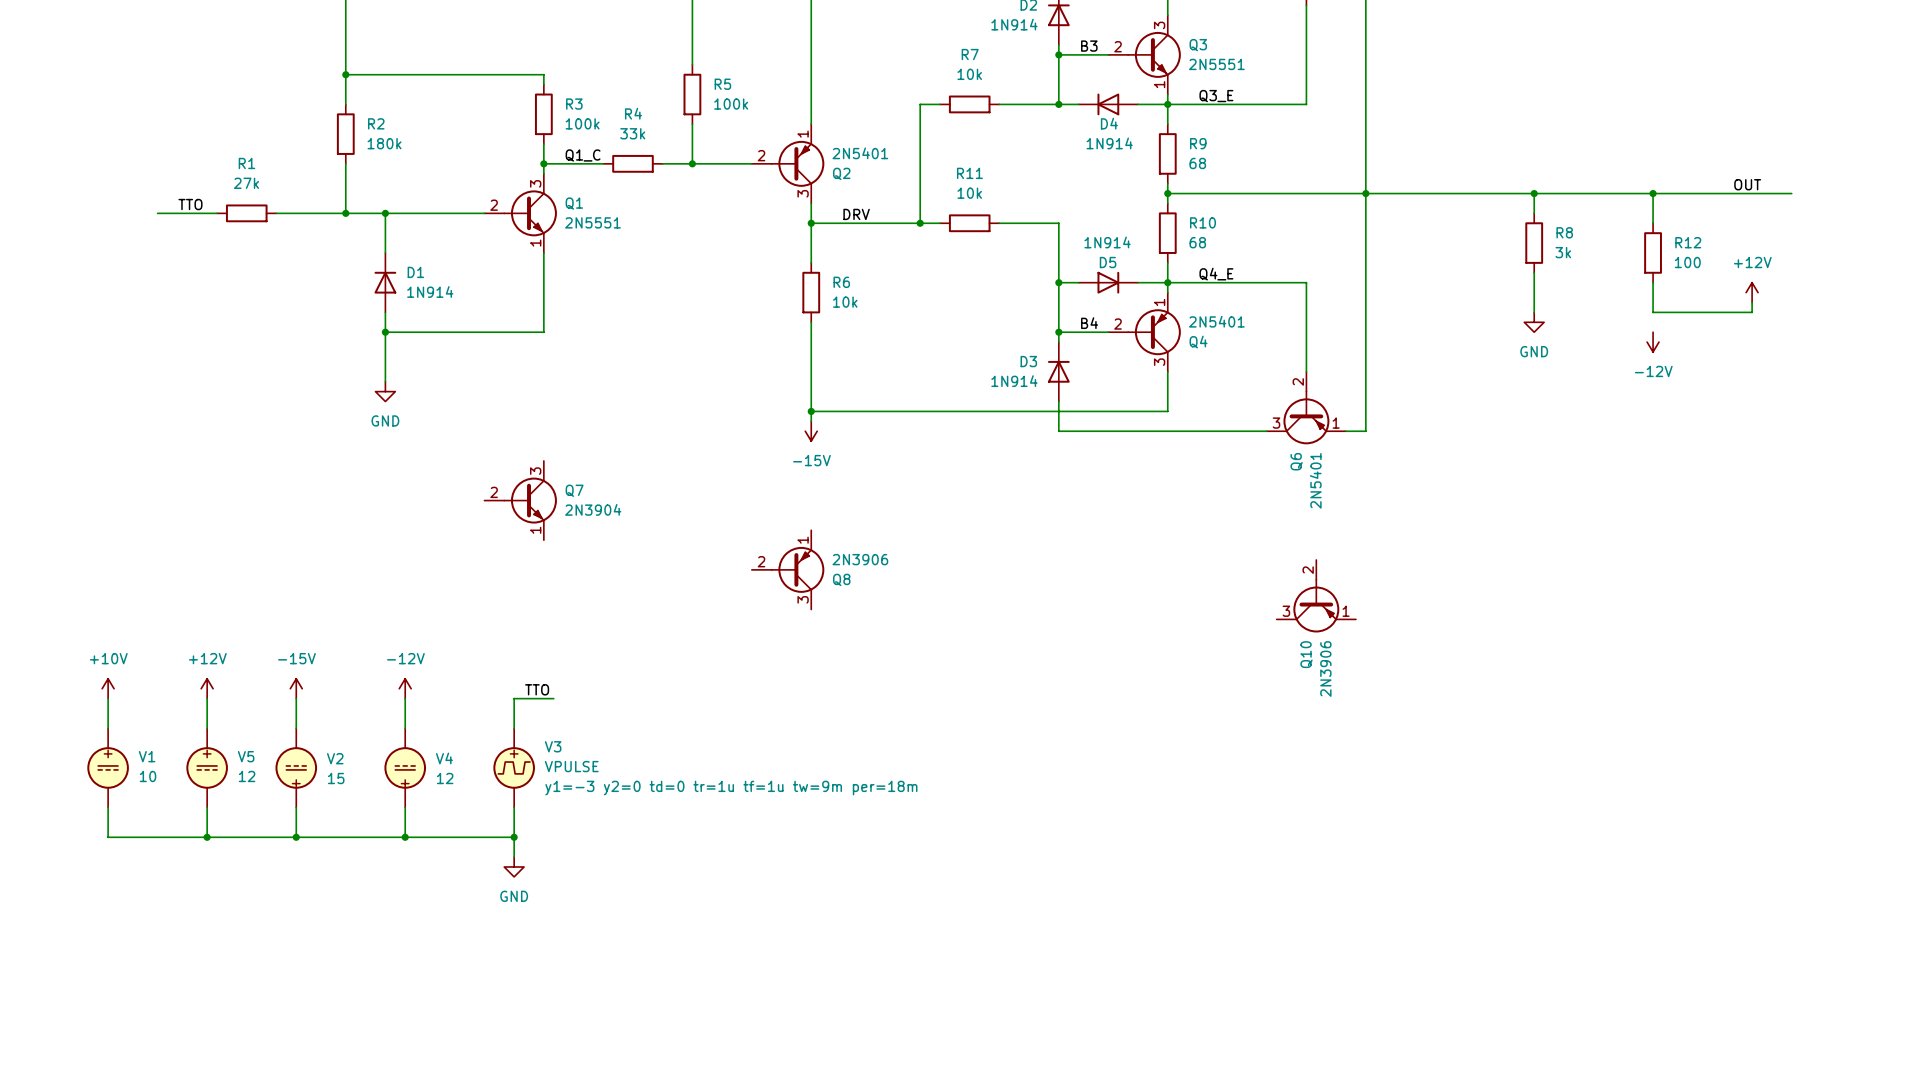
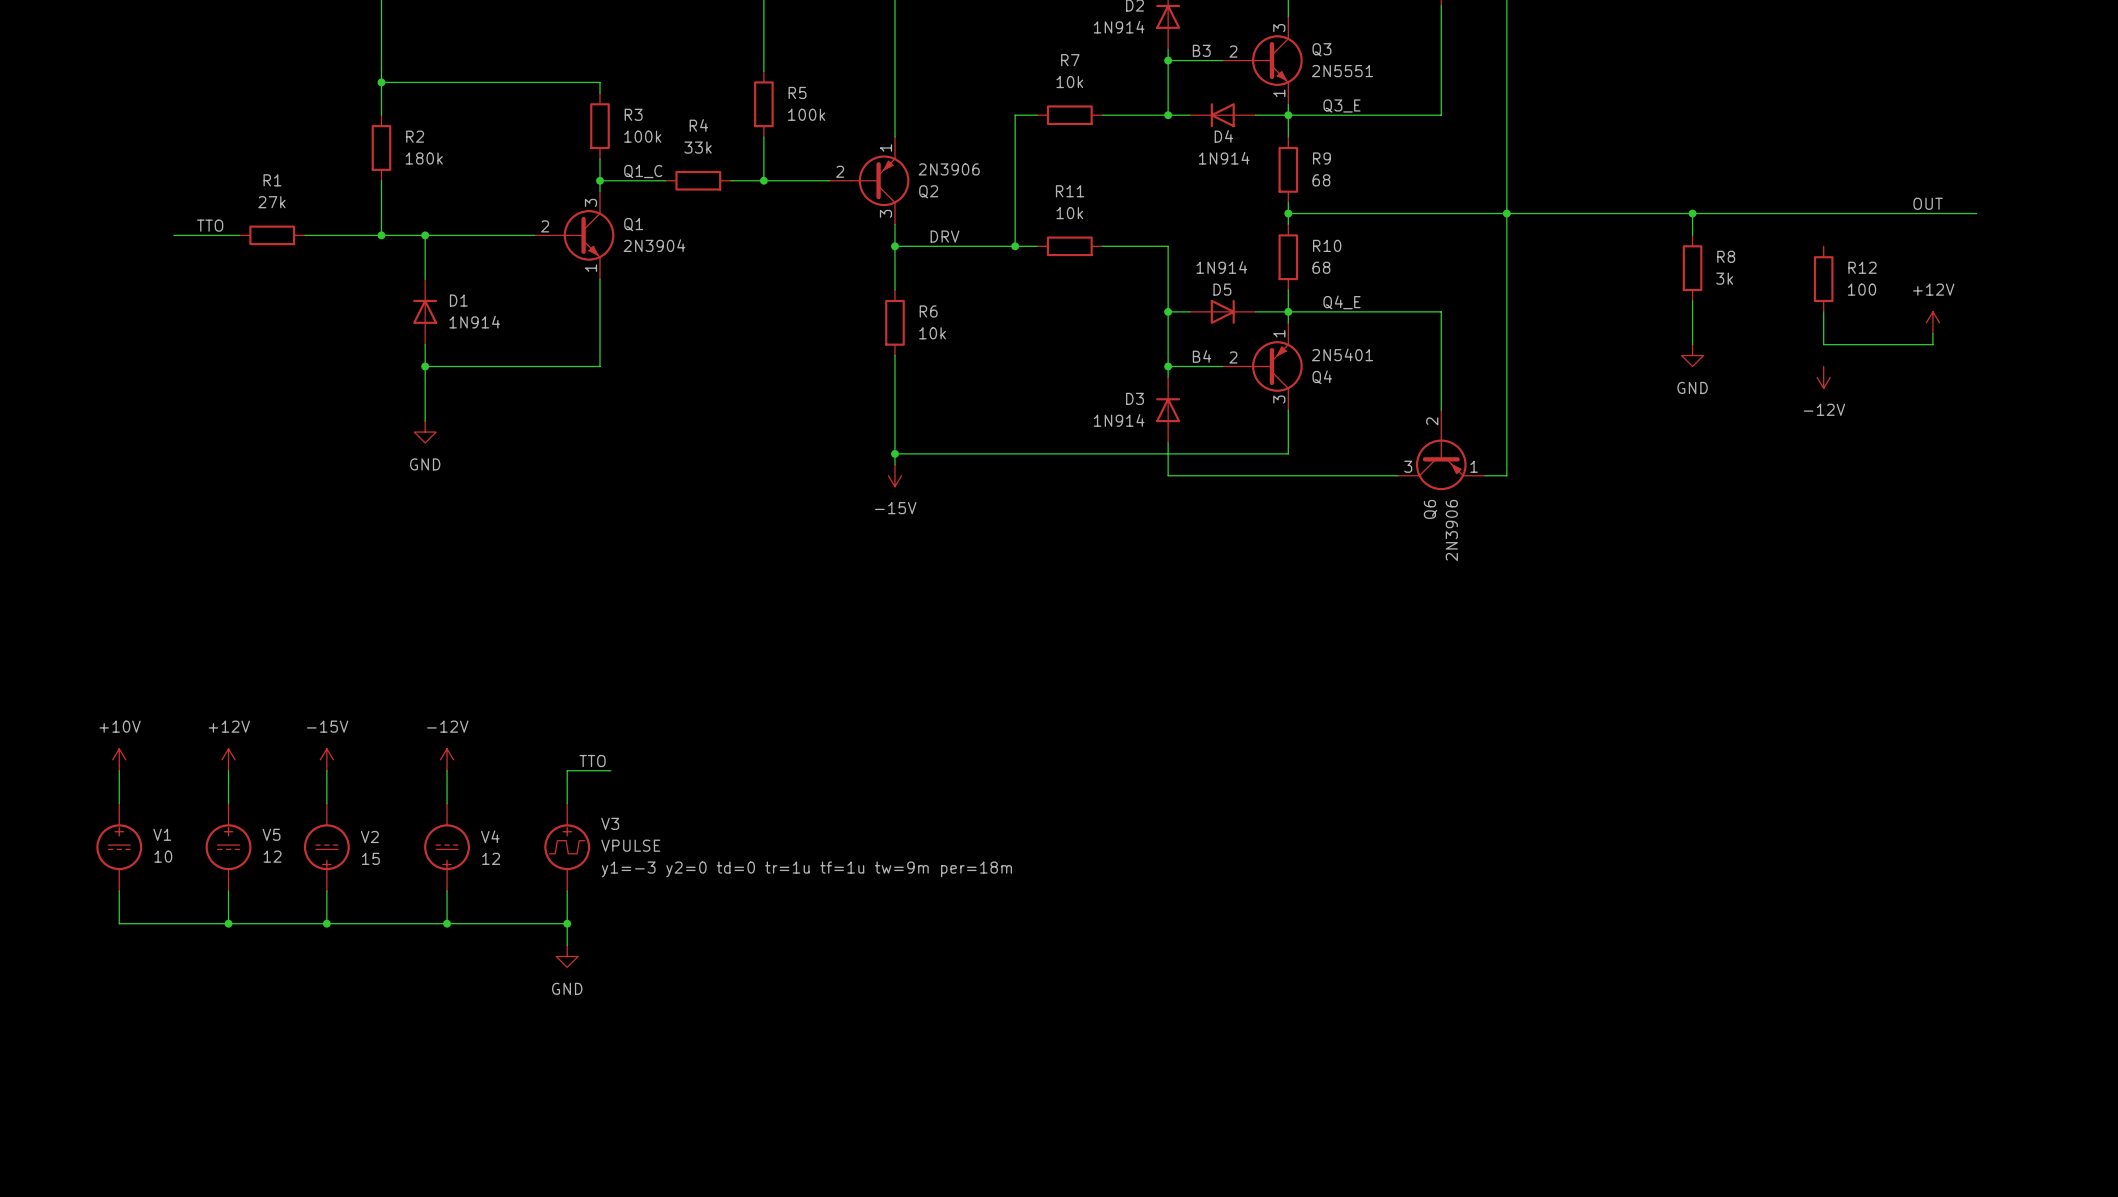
Q2 value: 2N5401 (860, 153) -> 2N3906 (949, 169)
wire: (1653, 193) (1653, 223) -> none
junction: (1653, 193) -> none
Q1 value: 2N5551 (592, 222) -> 2N3904 (654, 245)
Q6 value: 2N5401 (1315, 480) -> 2N3906 (1451, 530)
Q7: 2N3904 (520, 500) -> none
Q8: 2N3906 (788, 569) -> none
Q10: 2N3906 (1316, 596) -> none

